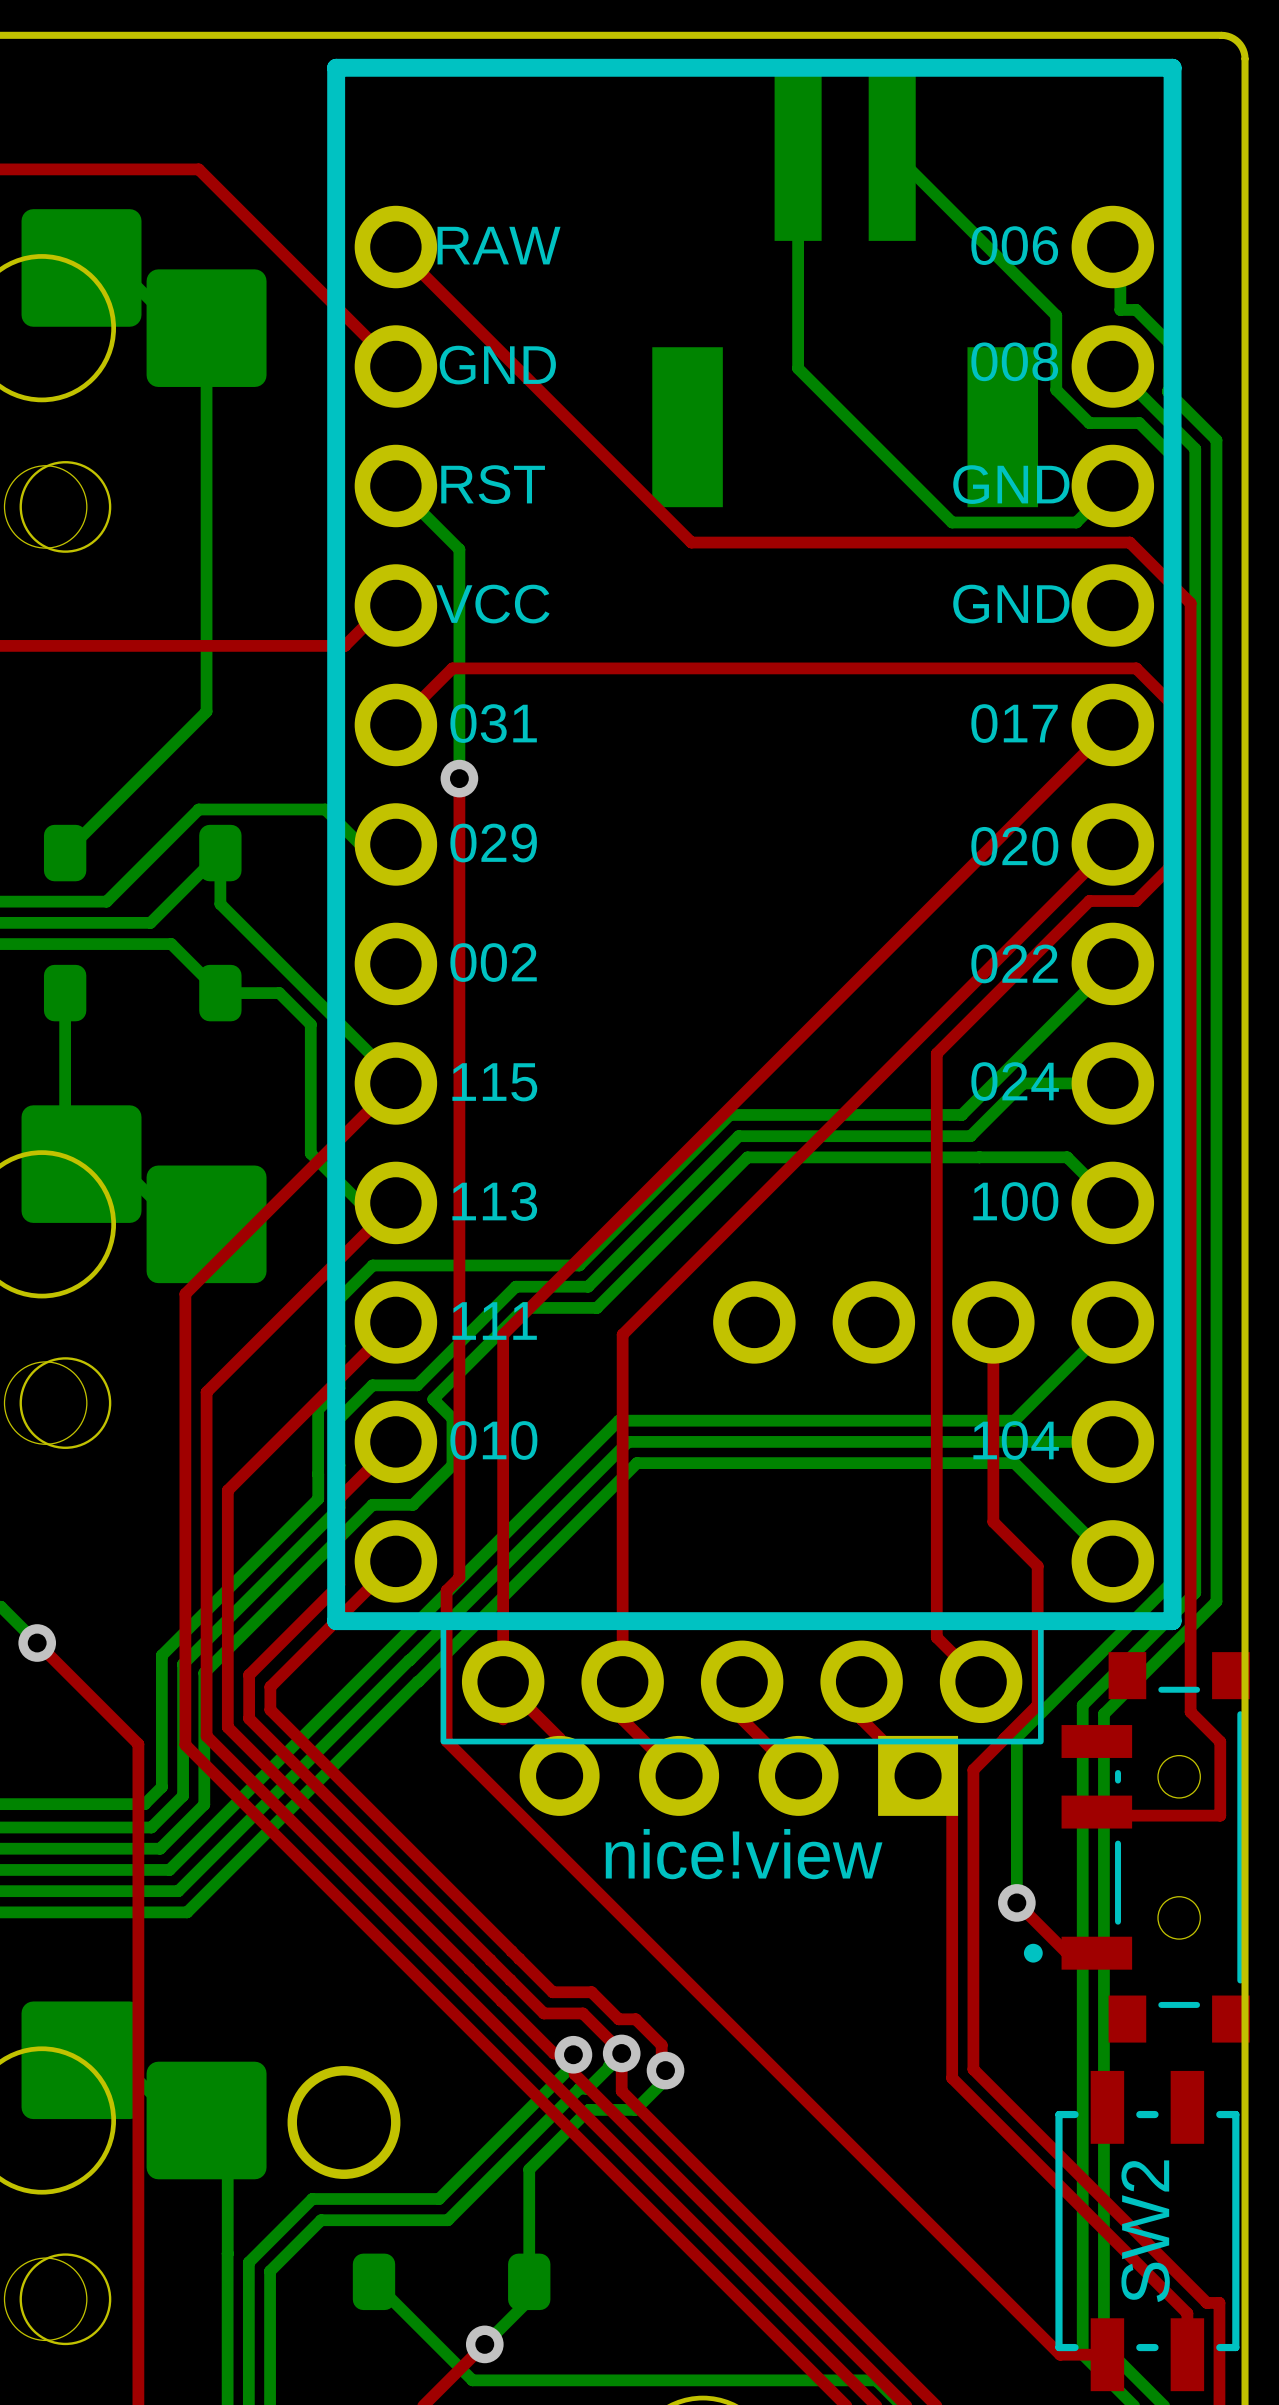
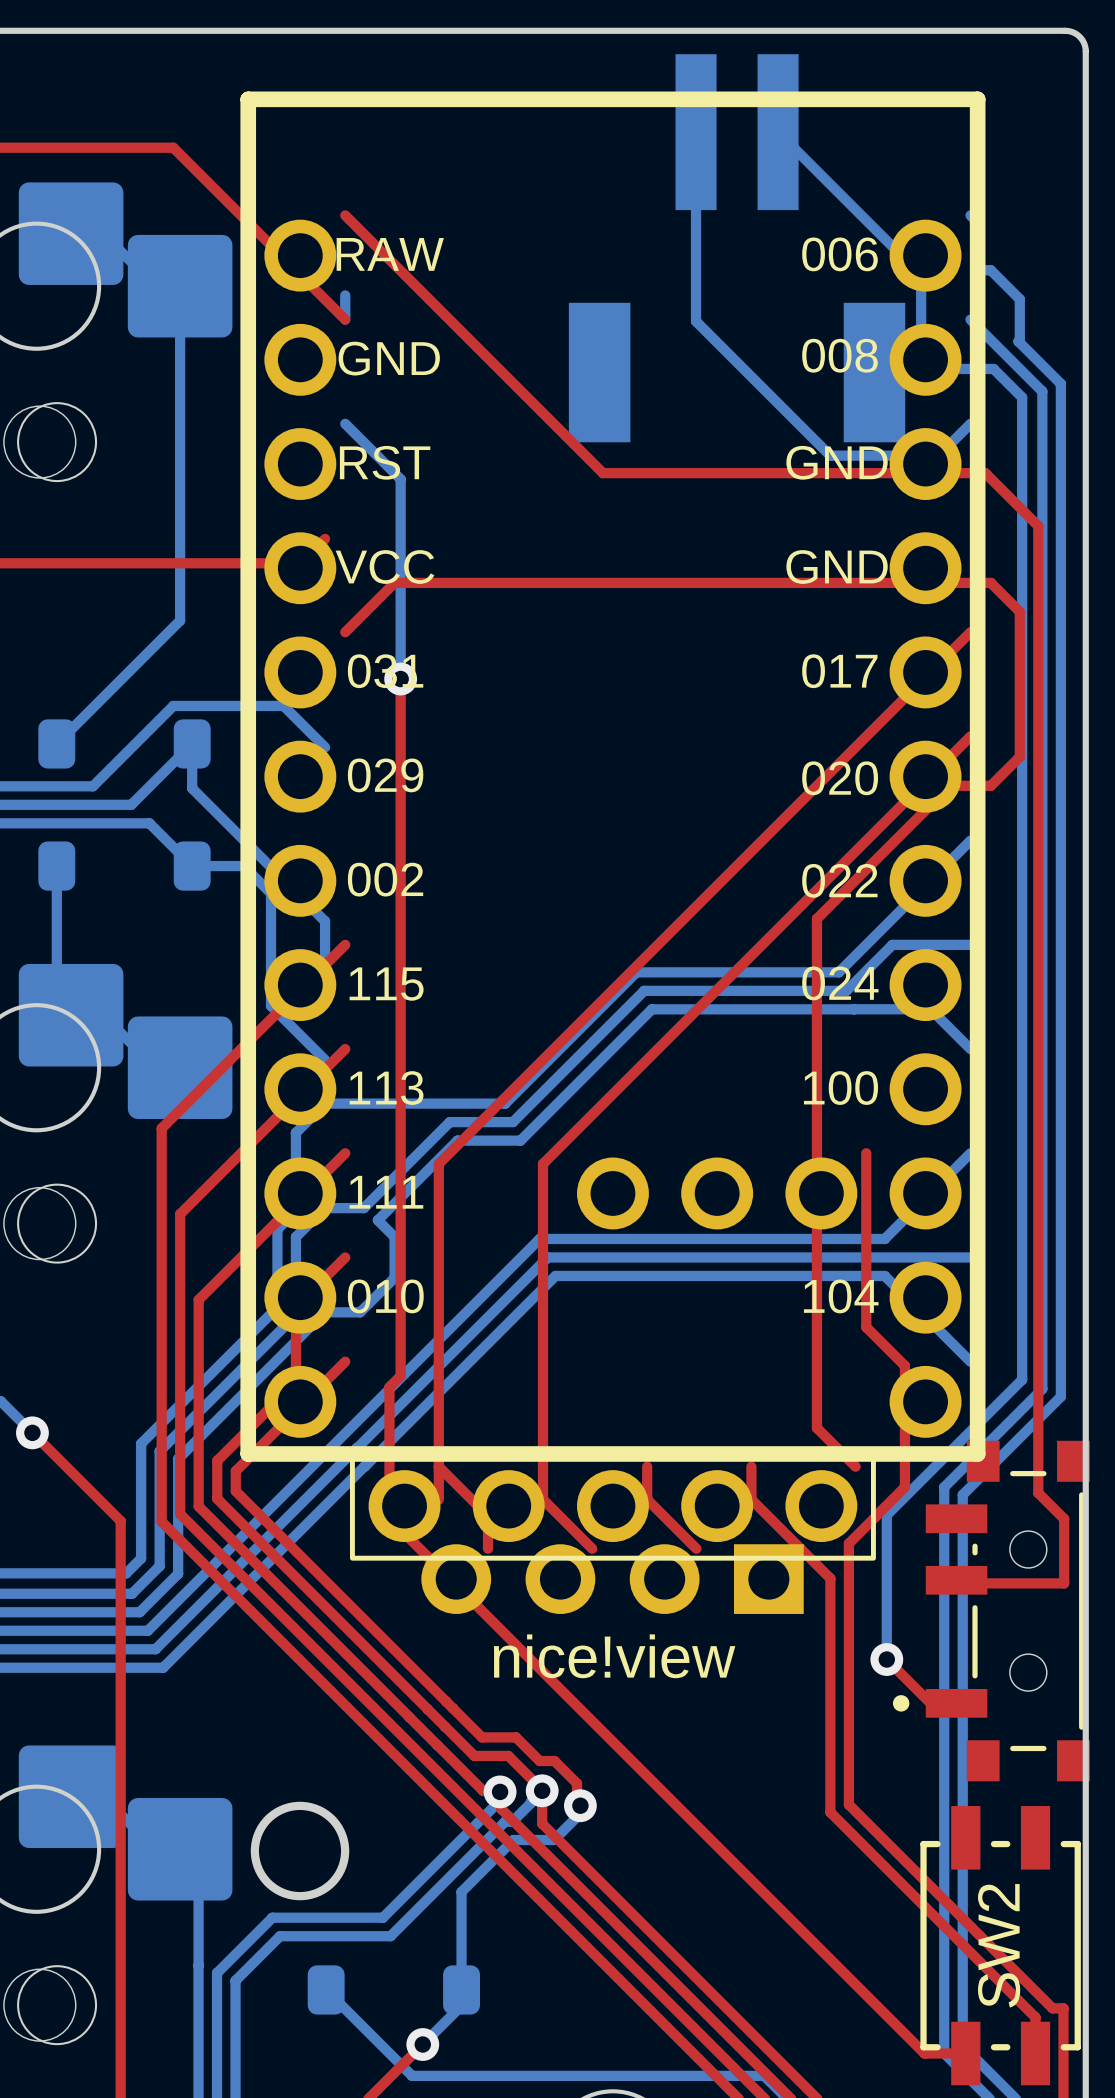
part position: (754, 844) -> (612, 776)
part position: (742, 1681) -> (612, 1506)
part position: (738, 1775) -> (612, 1579)

